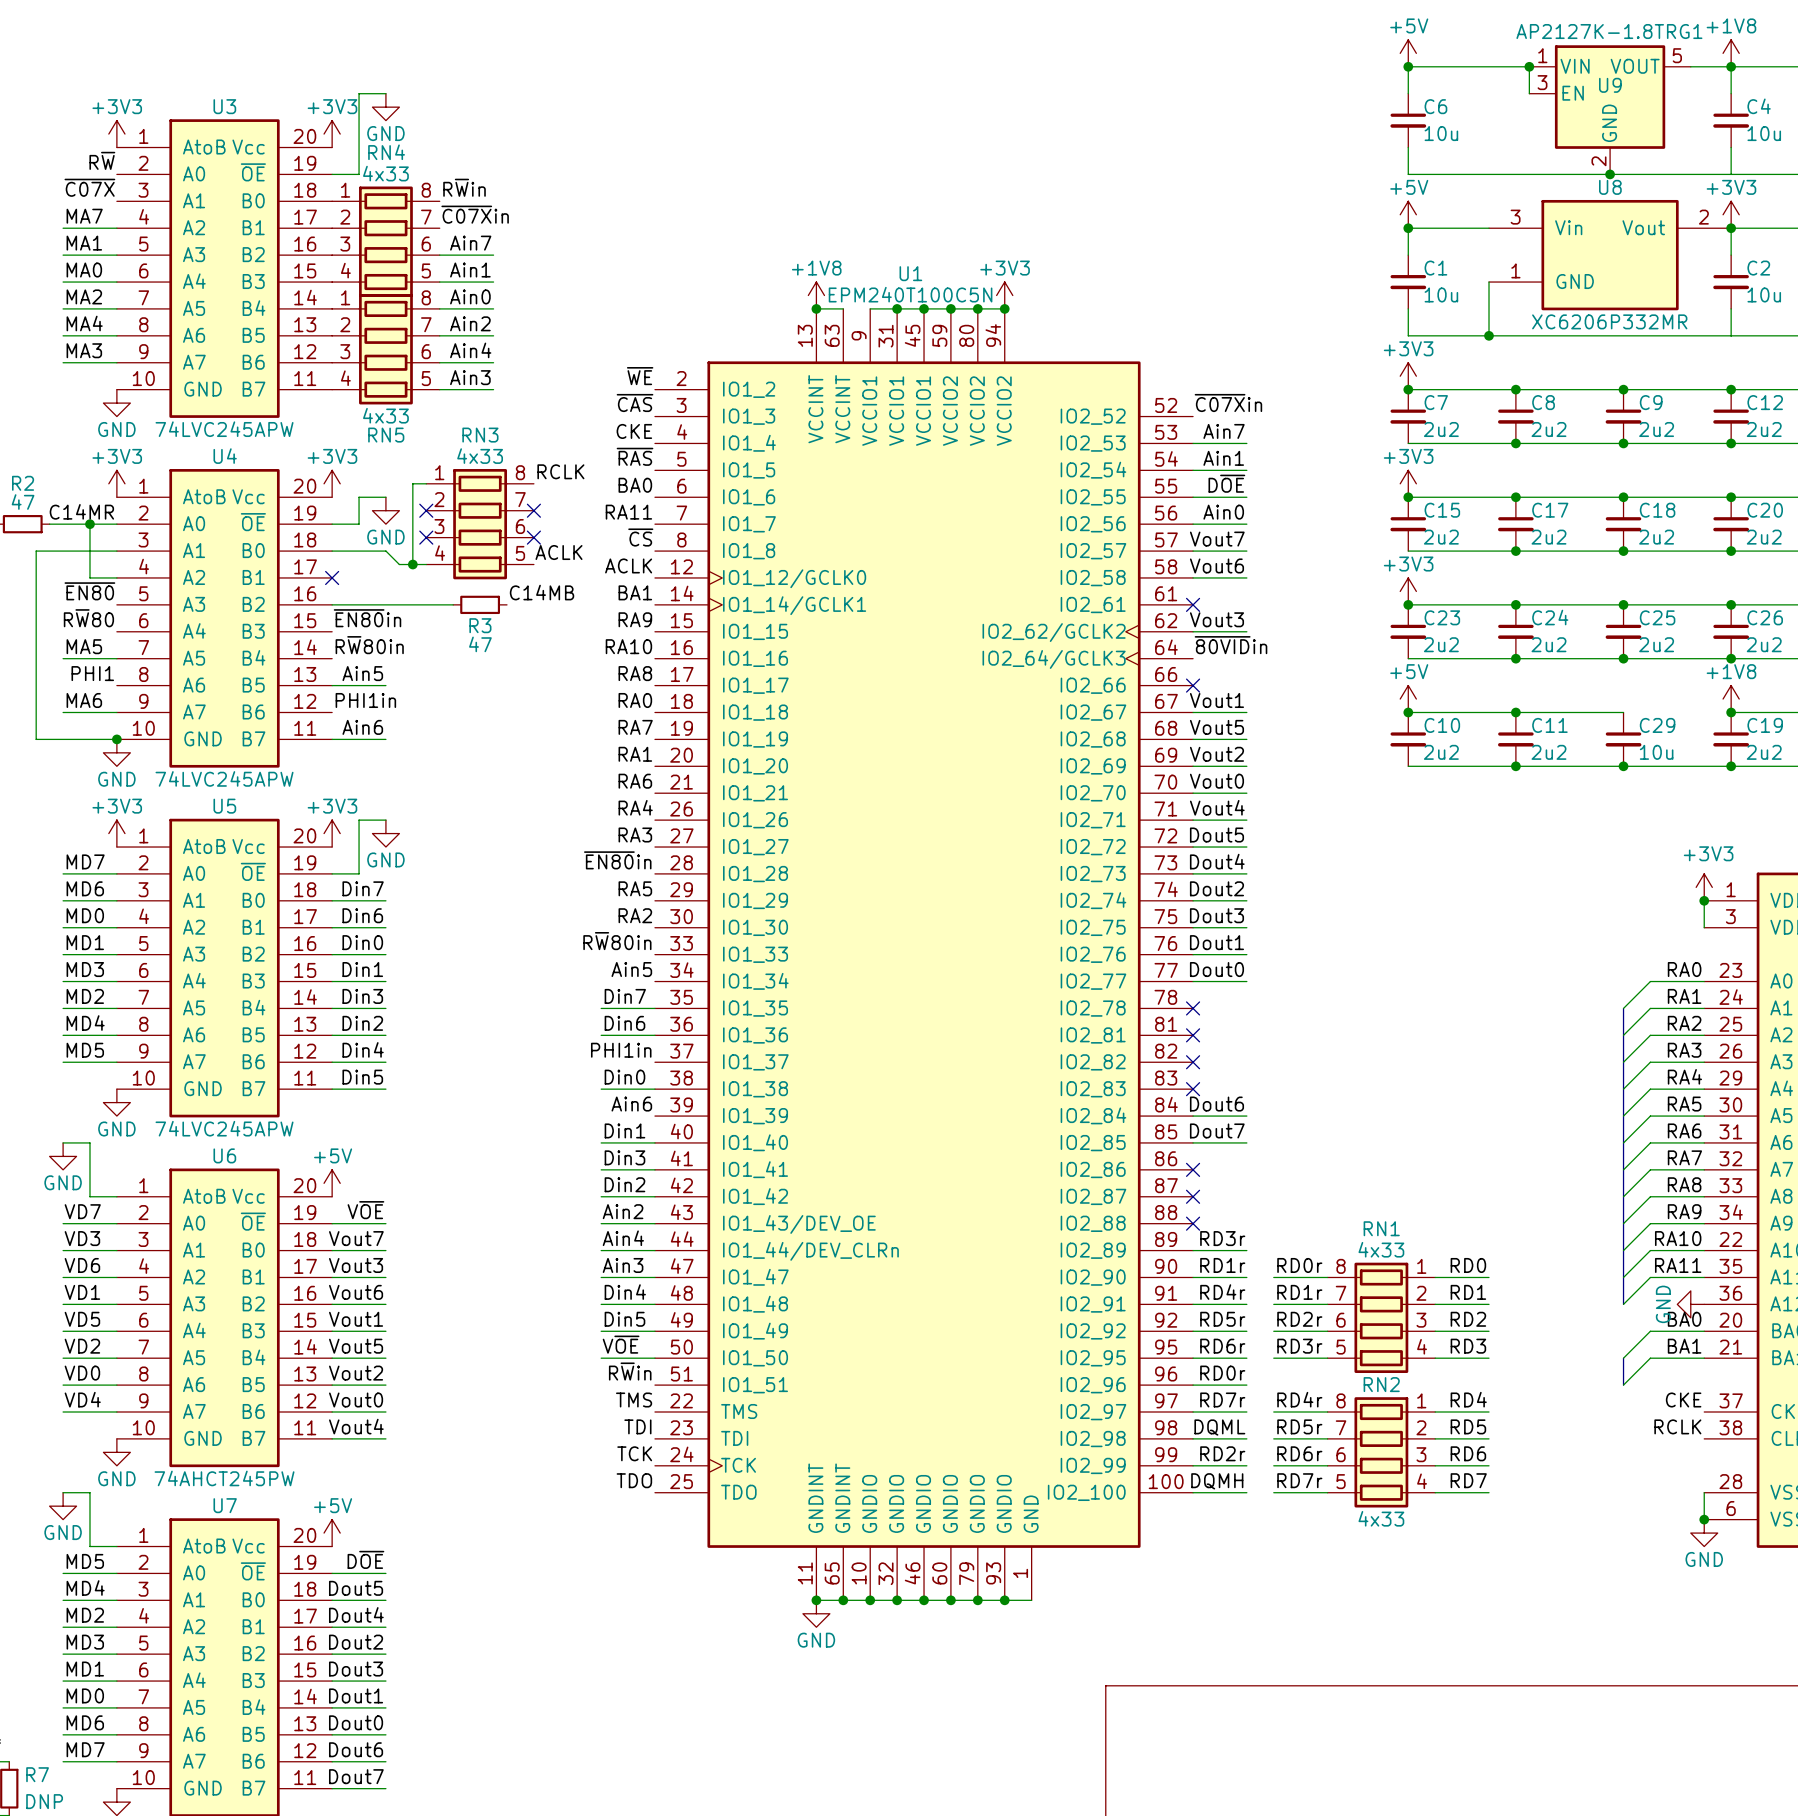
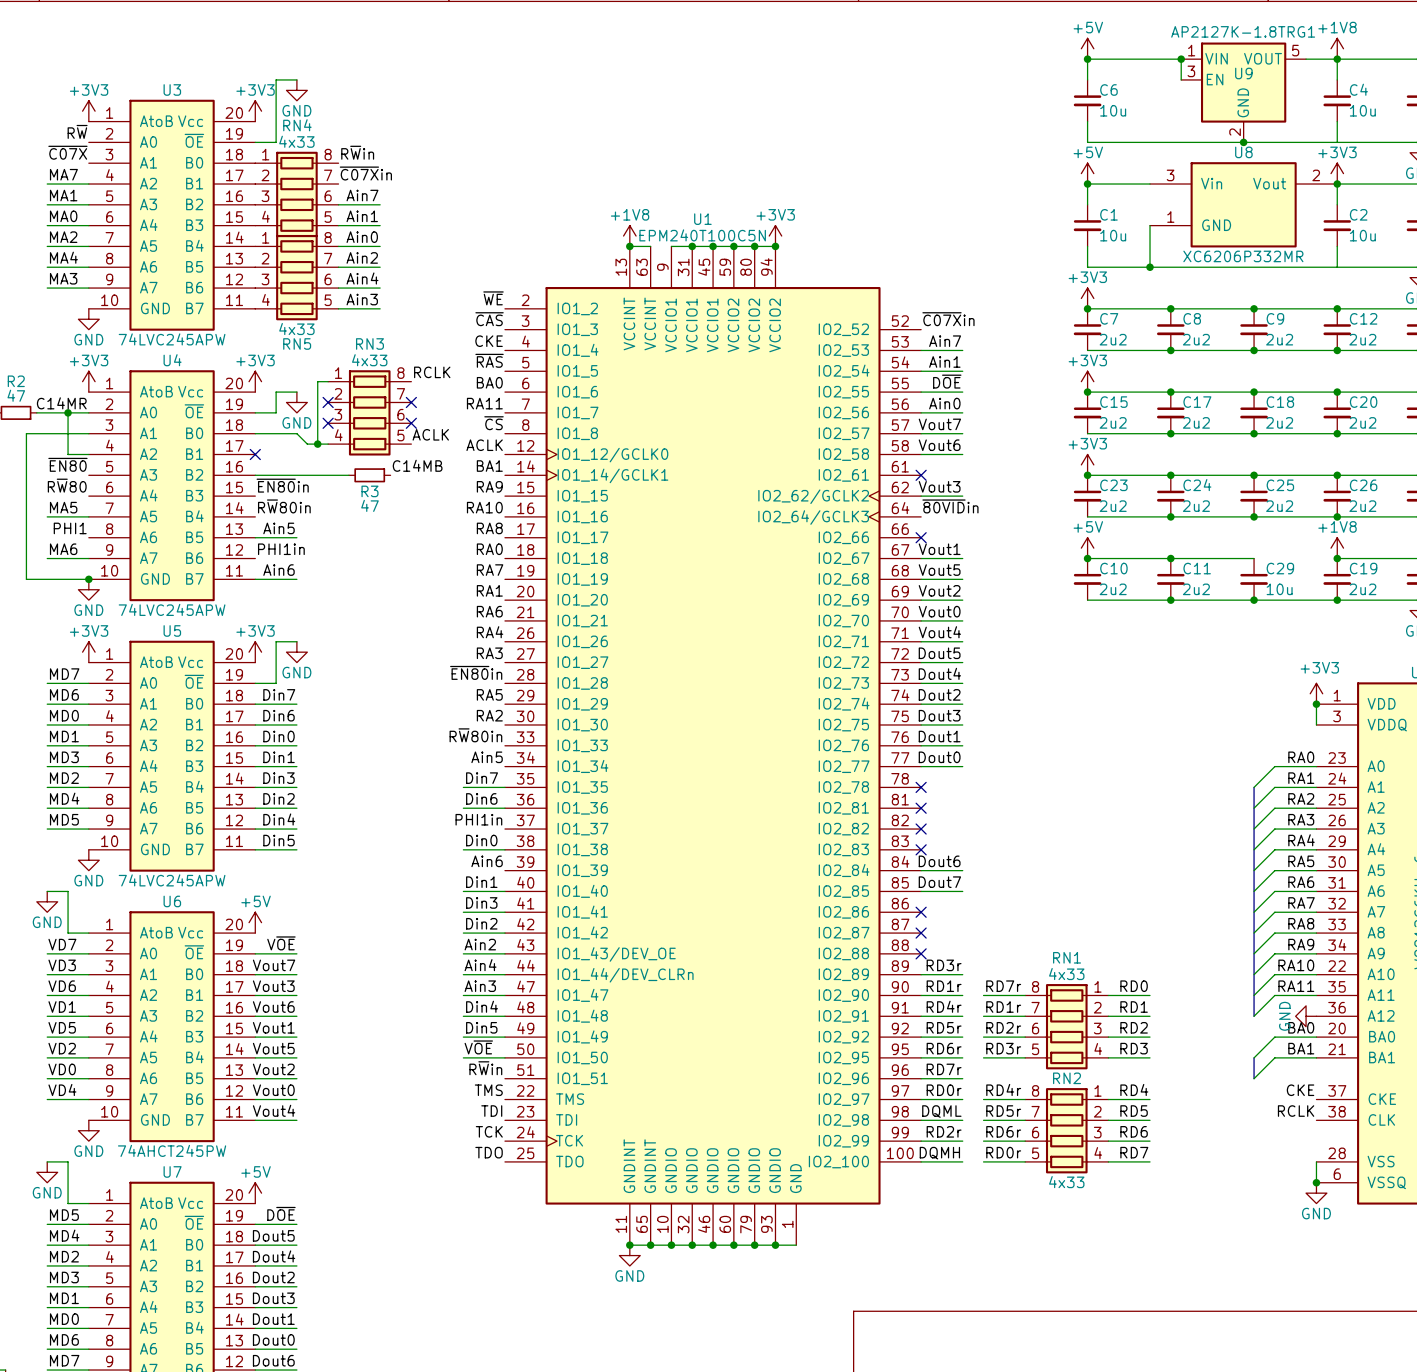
label: RD0r (1299, 1265) -> RD7r (1003, 986)
label: RD0r (1222, 1373) -> RD7r (944, 1069)
label: RD7r (1222, 1399) -> RD0r (944, 1090)
label: RD7r (1299, 1480) -> RD0r (1003, 1152)

